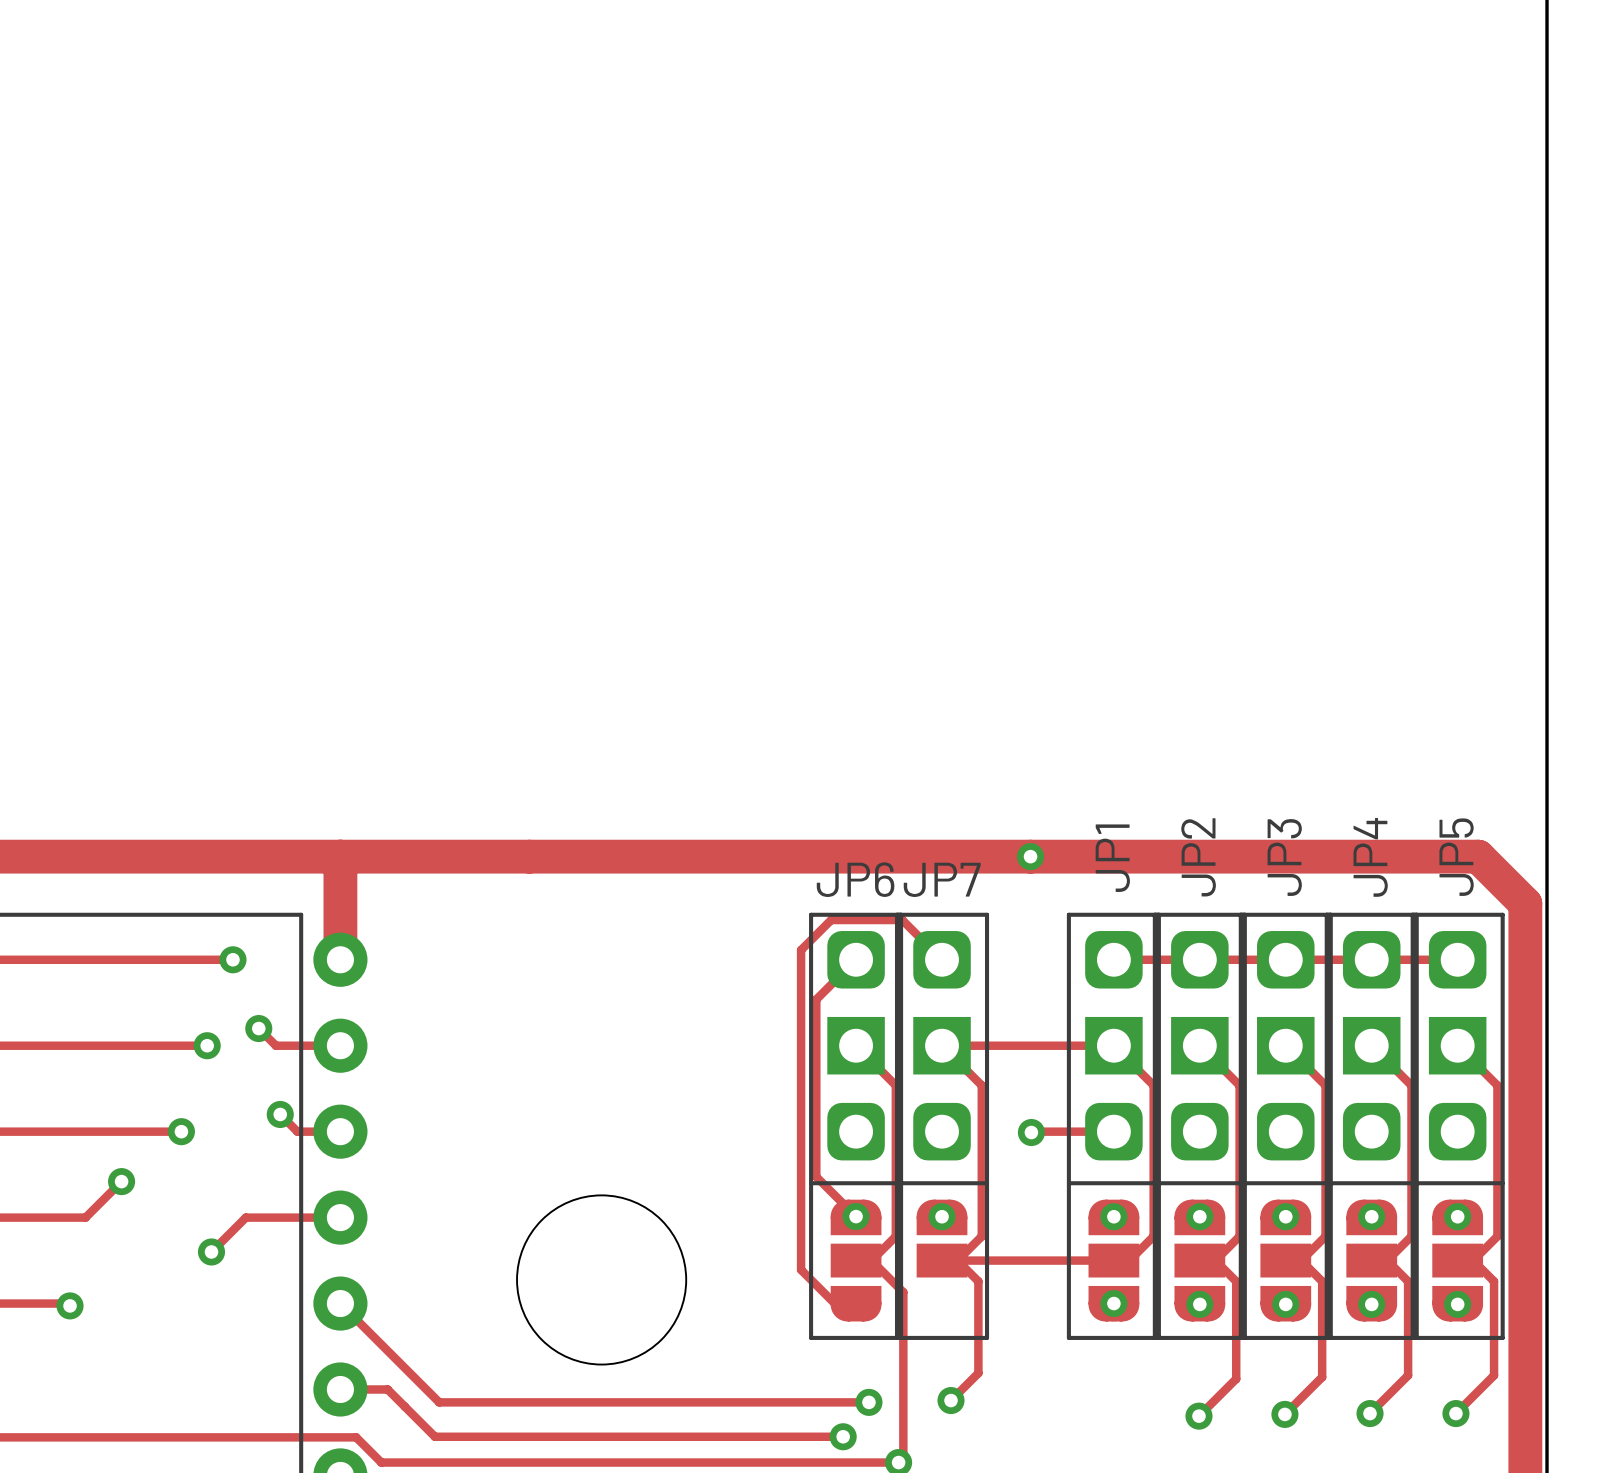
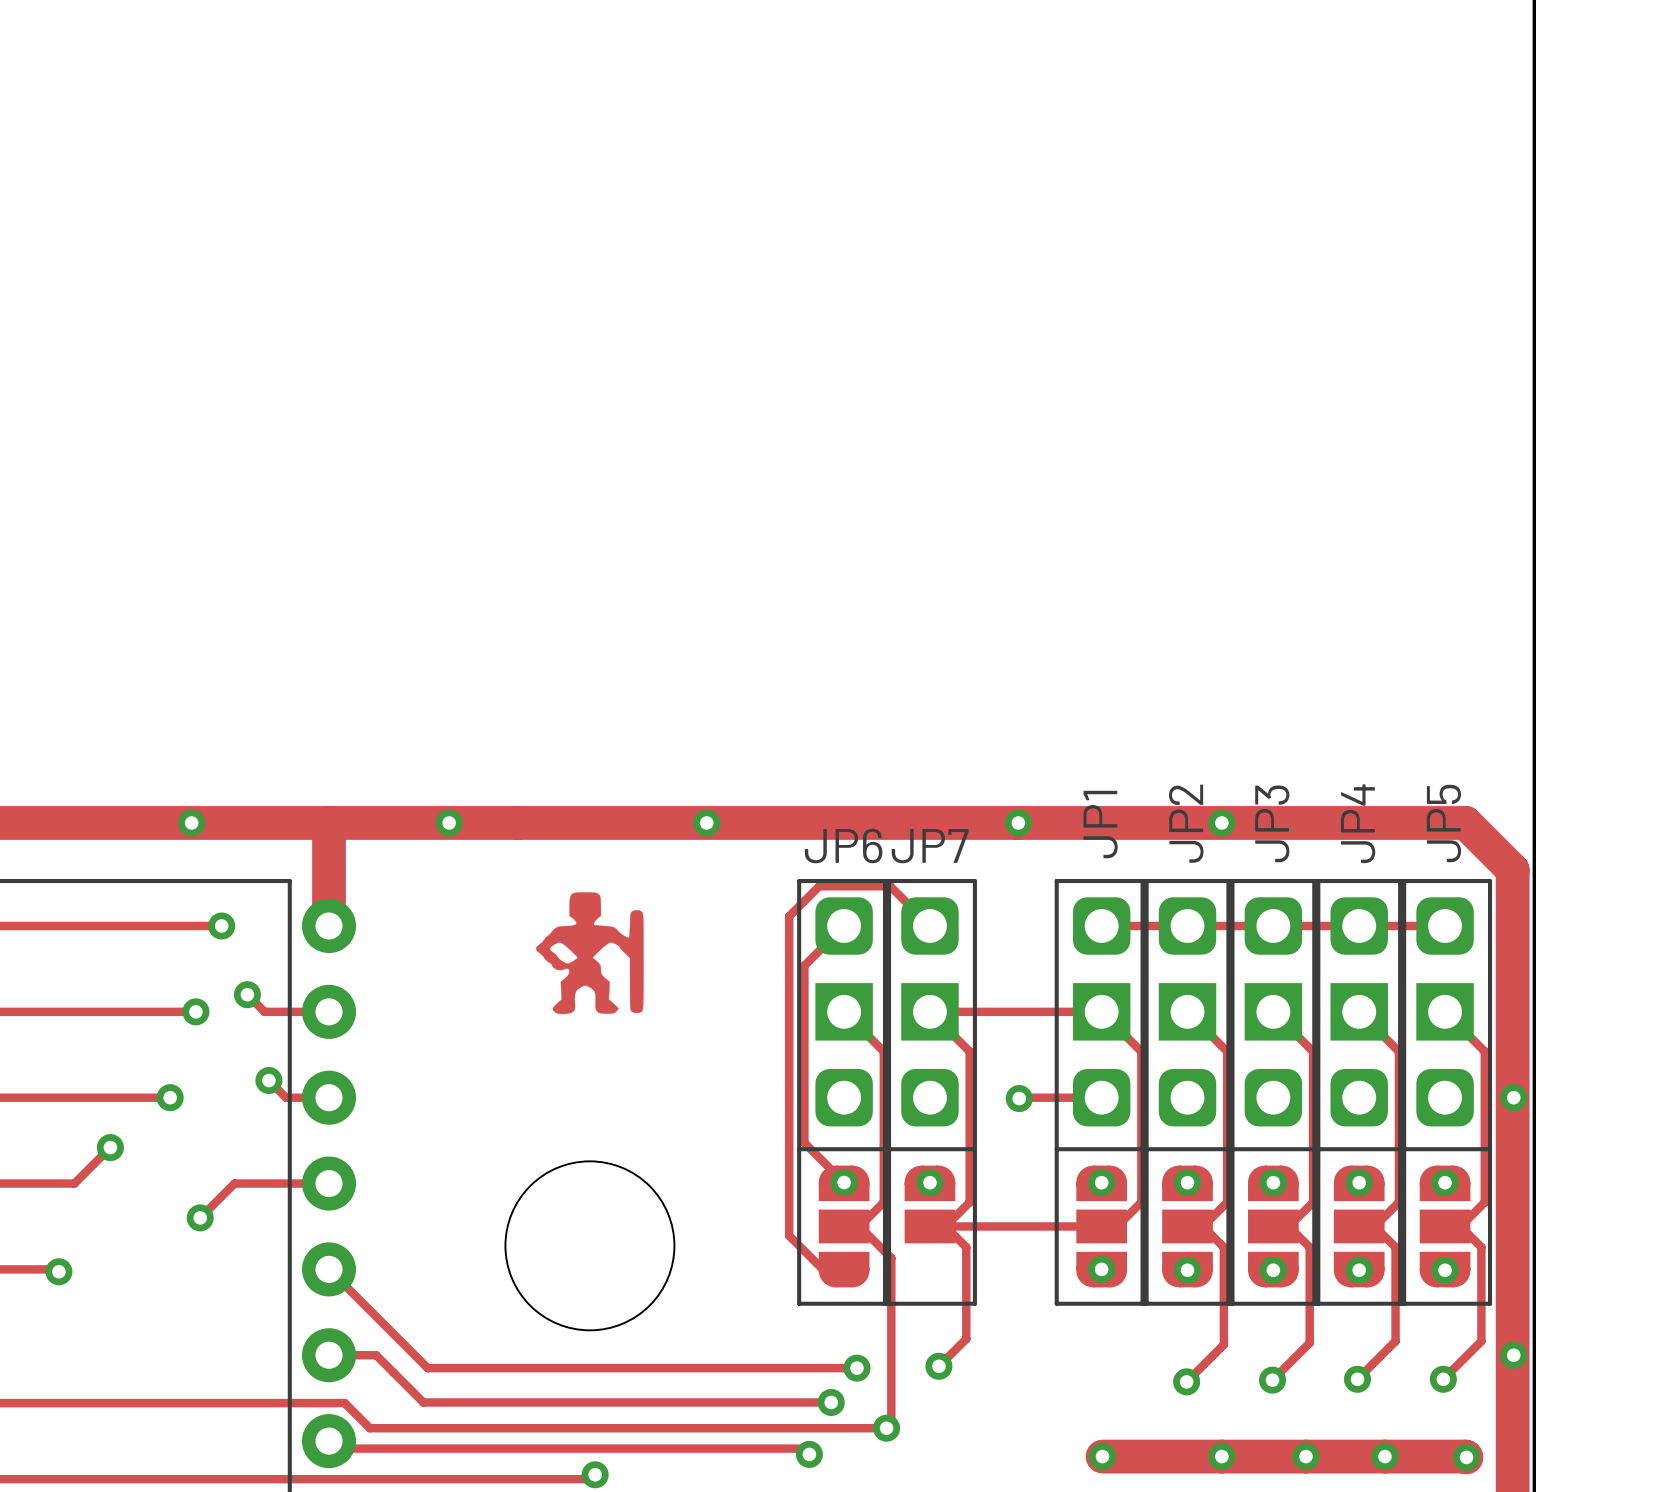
via: none -> (191, 822)
via: none -> (449, 822)
via: none -> (706, 822)
via: none -> (1221, 822)
drawing: none -> [535, 892, 644, 1015]
via: none -> (1513, 1097)
via: none -> (1513, 1355)

